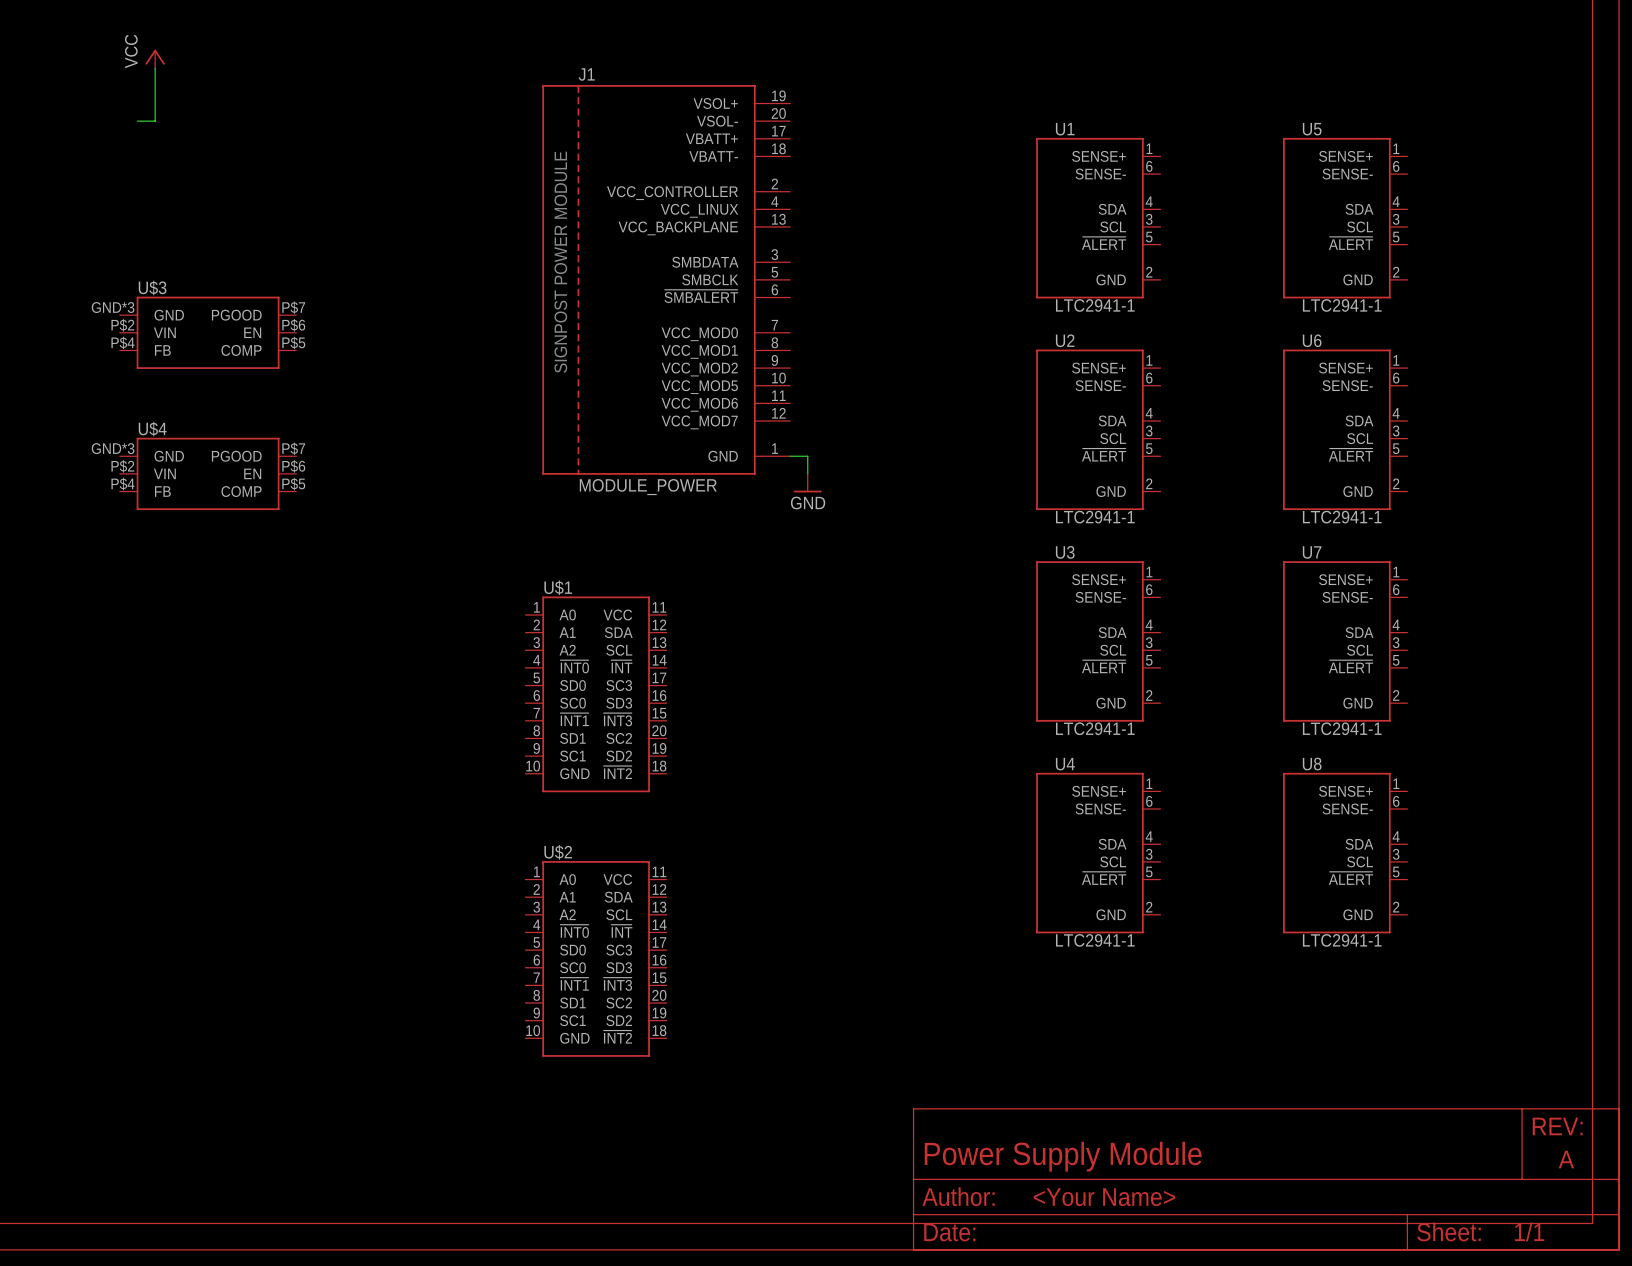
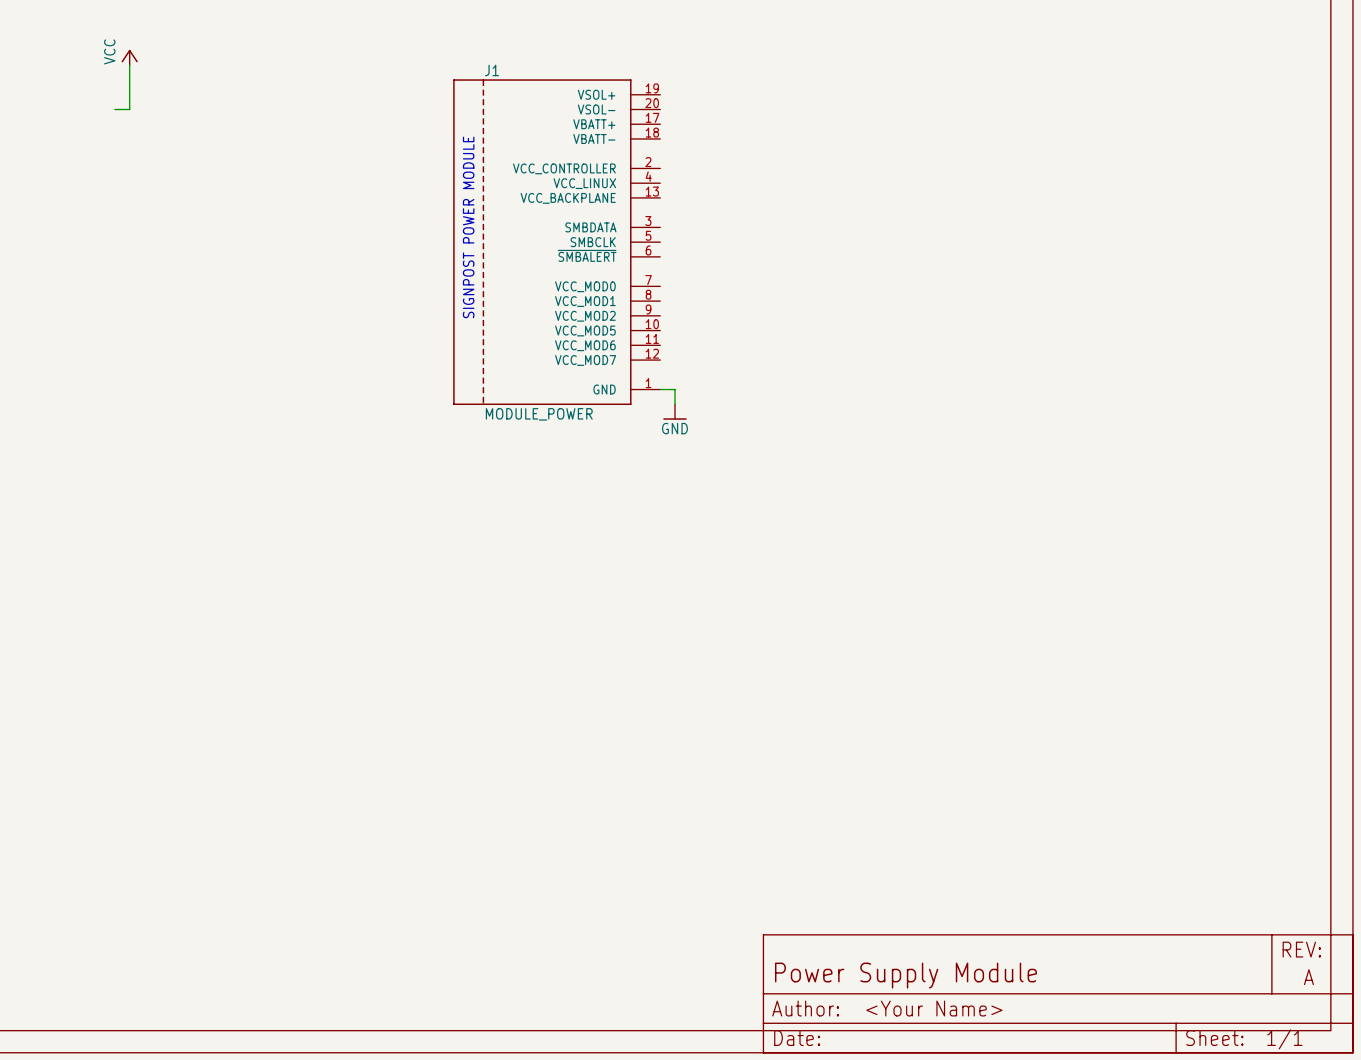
U1: LTC2941-1 (1098, 218) -> none
U5: LTC2941-1 (1345, 218) -> none
U$3: (208, 332) -> none
U2: LTC2941-1 (1098, 429) -> none
U6: LTC2941-1 (1345, 429) -> none
U$4: (208, 473) -> none
U3: LTC2941-1 (1098, 641) -> none
U7: LTC2941-1 (1345, 641) -> none
U$1: (596, 694) -> none
U4: LTC2941-1 (1098, 853) -> none
U8: LTC2941-1 (1345, 853) -> none
U$2: (596, 958) -> none

